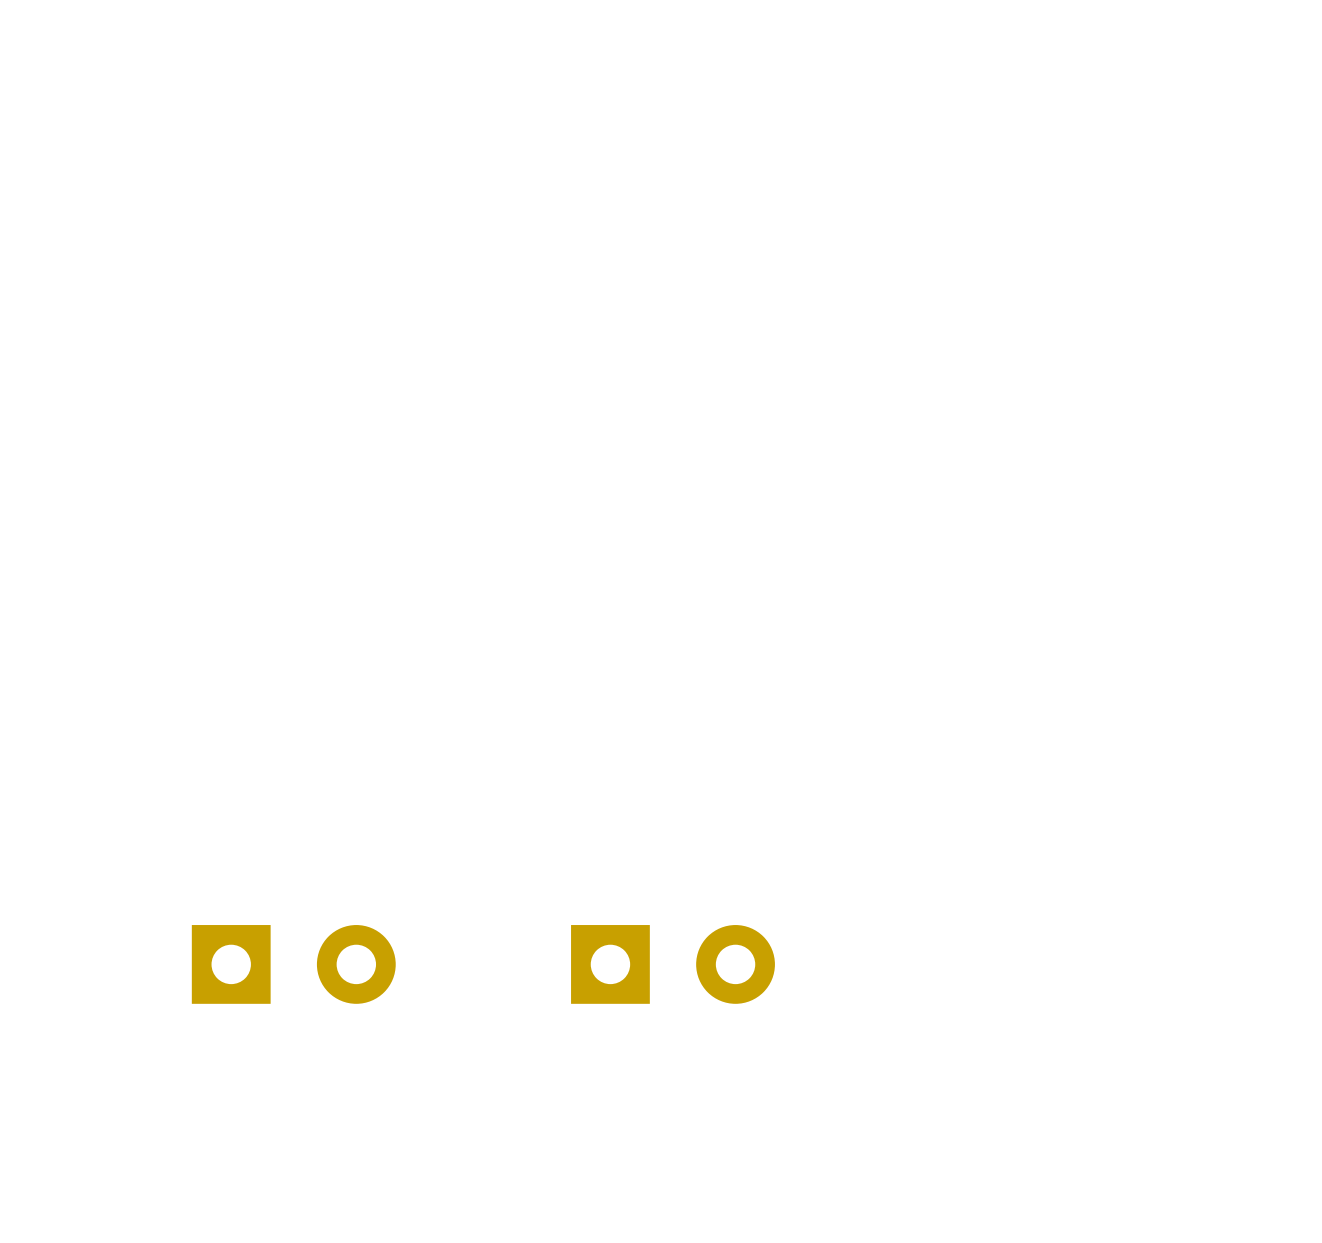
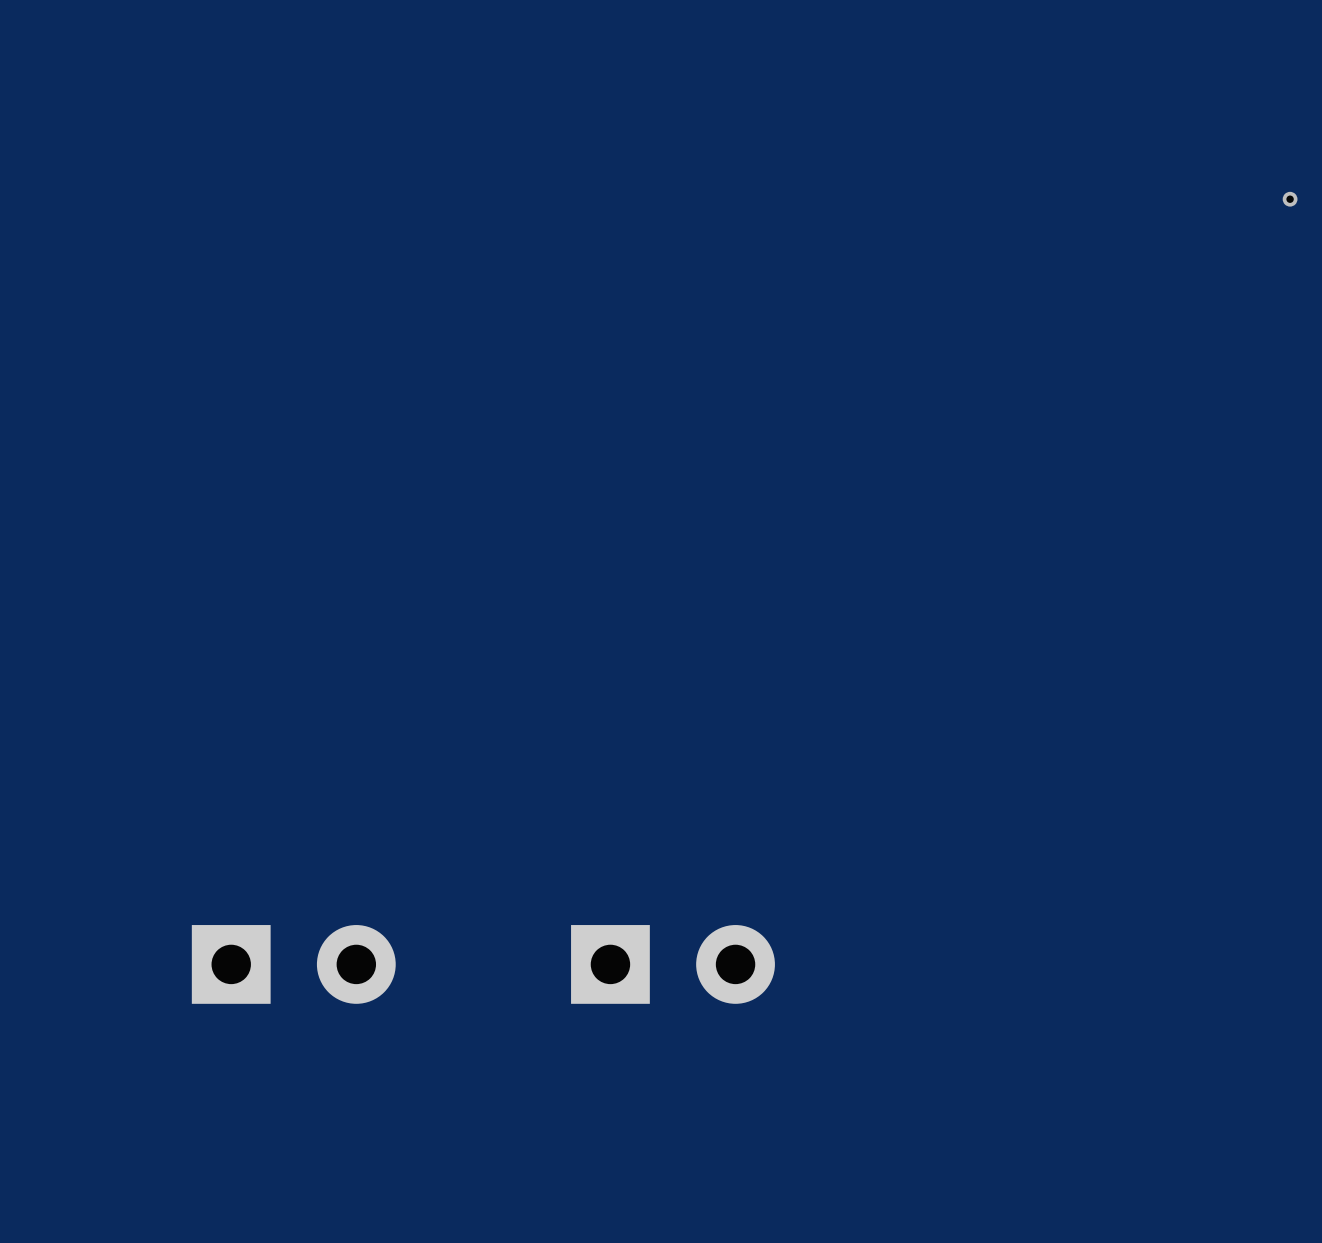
via: none -> (1290, 199)

